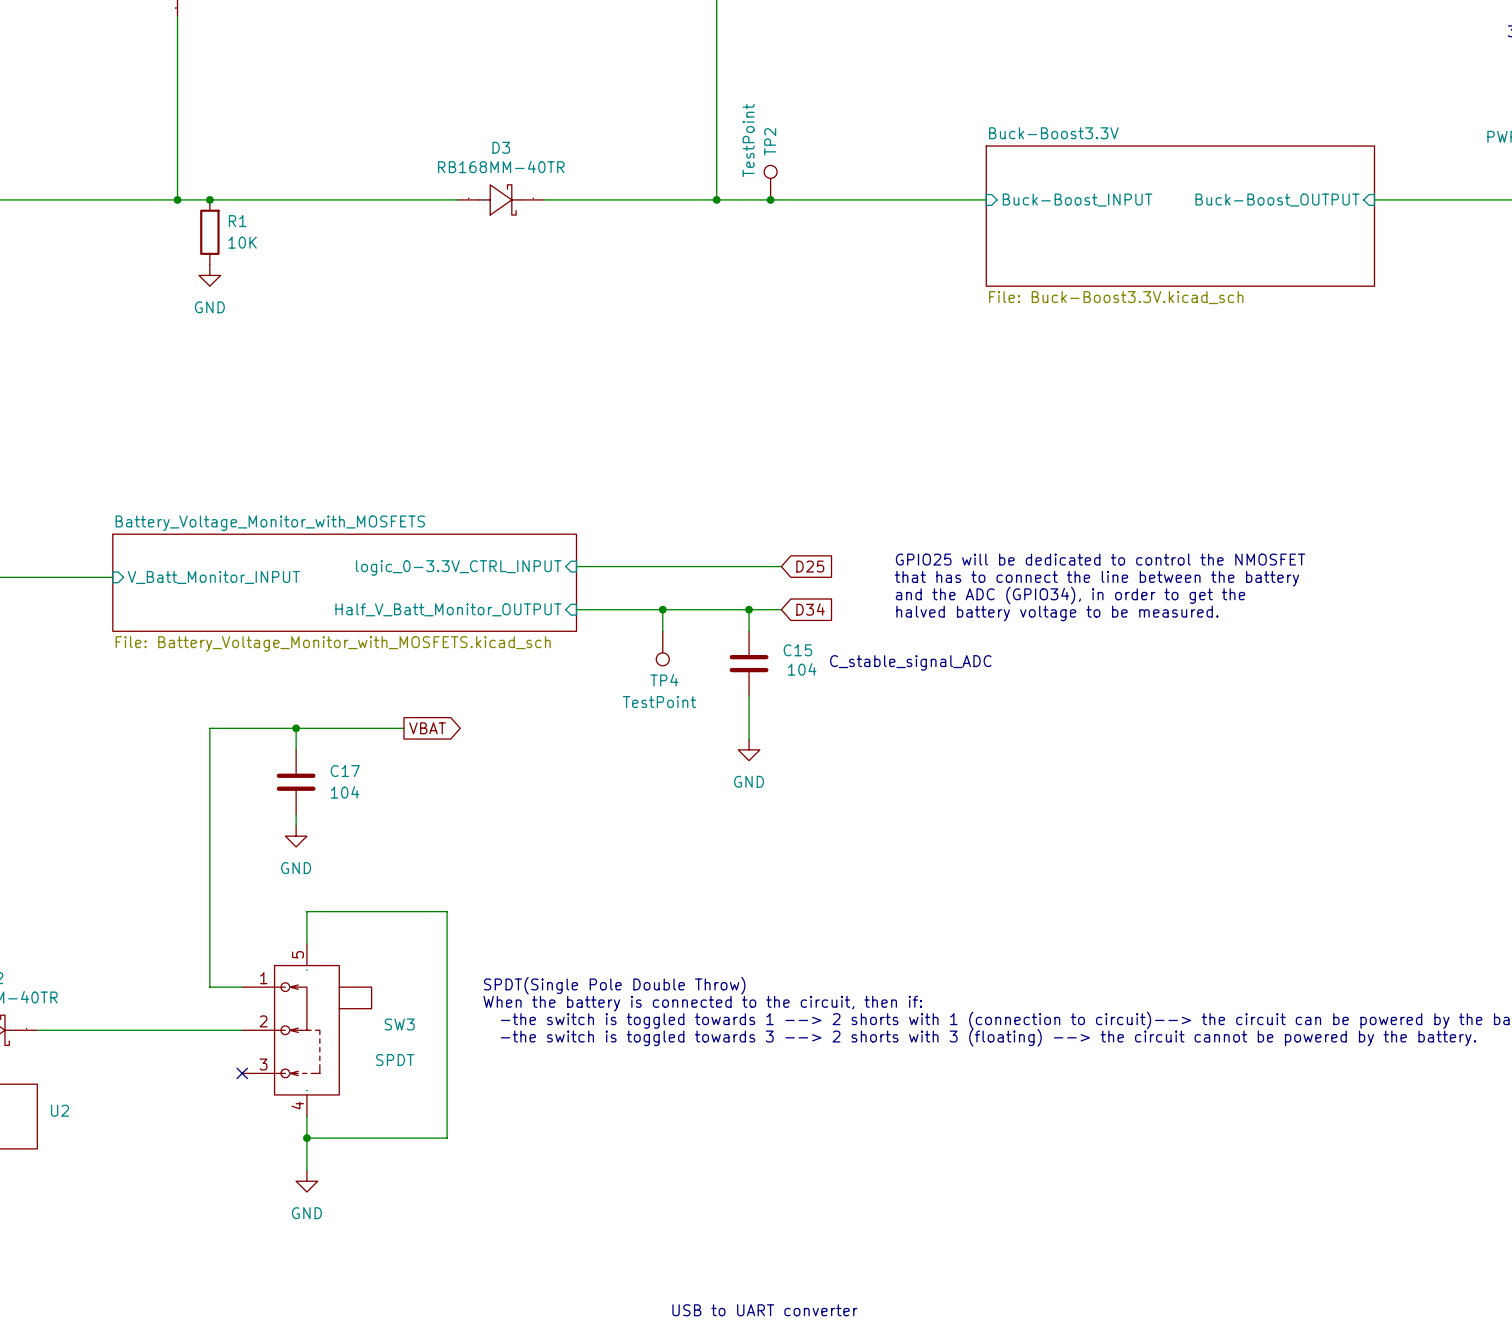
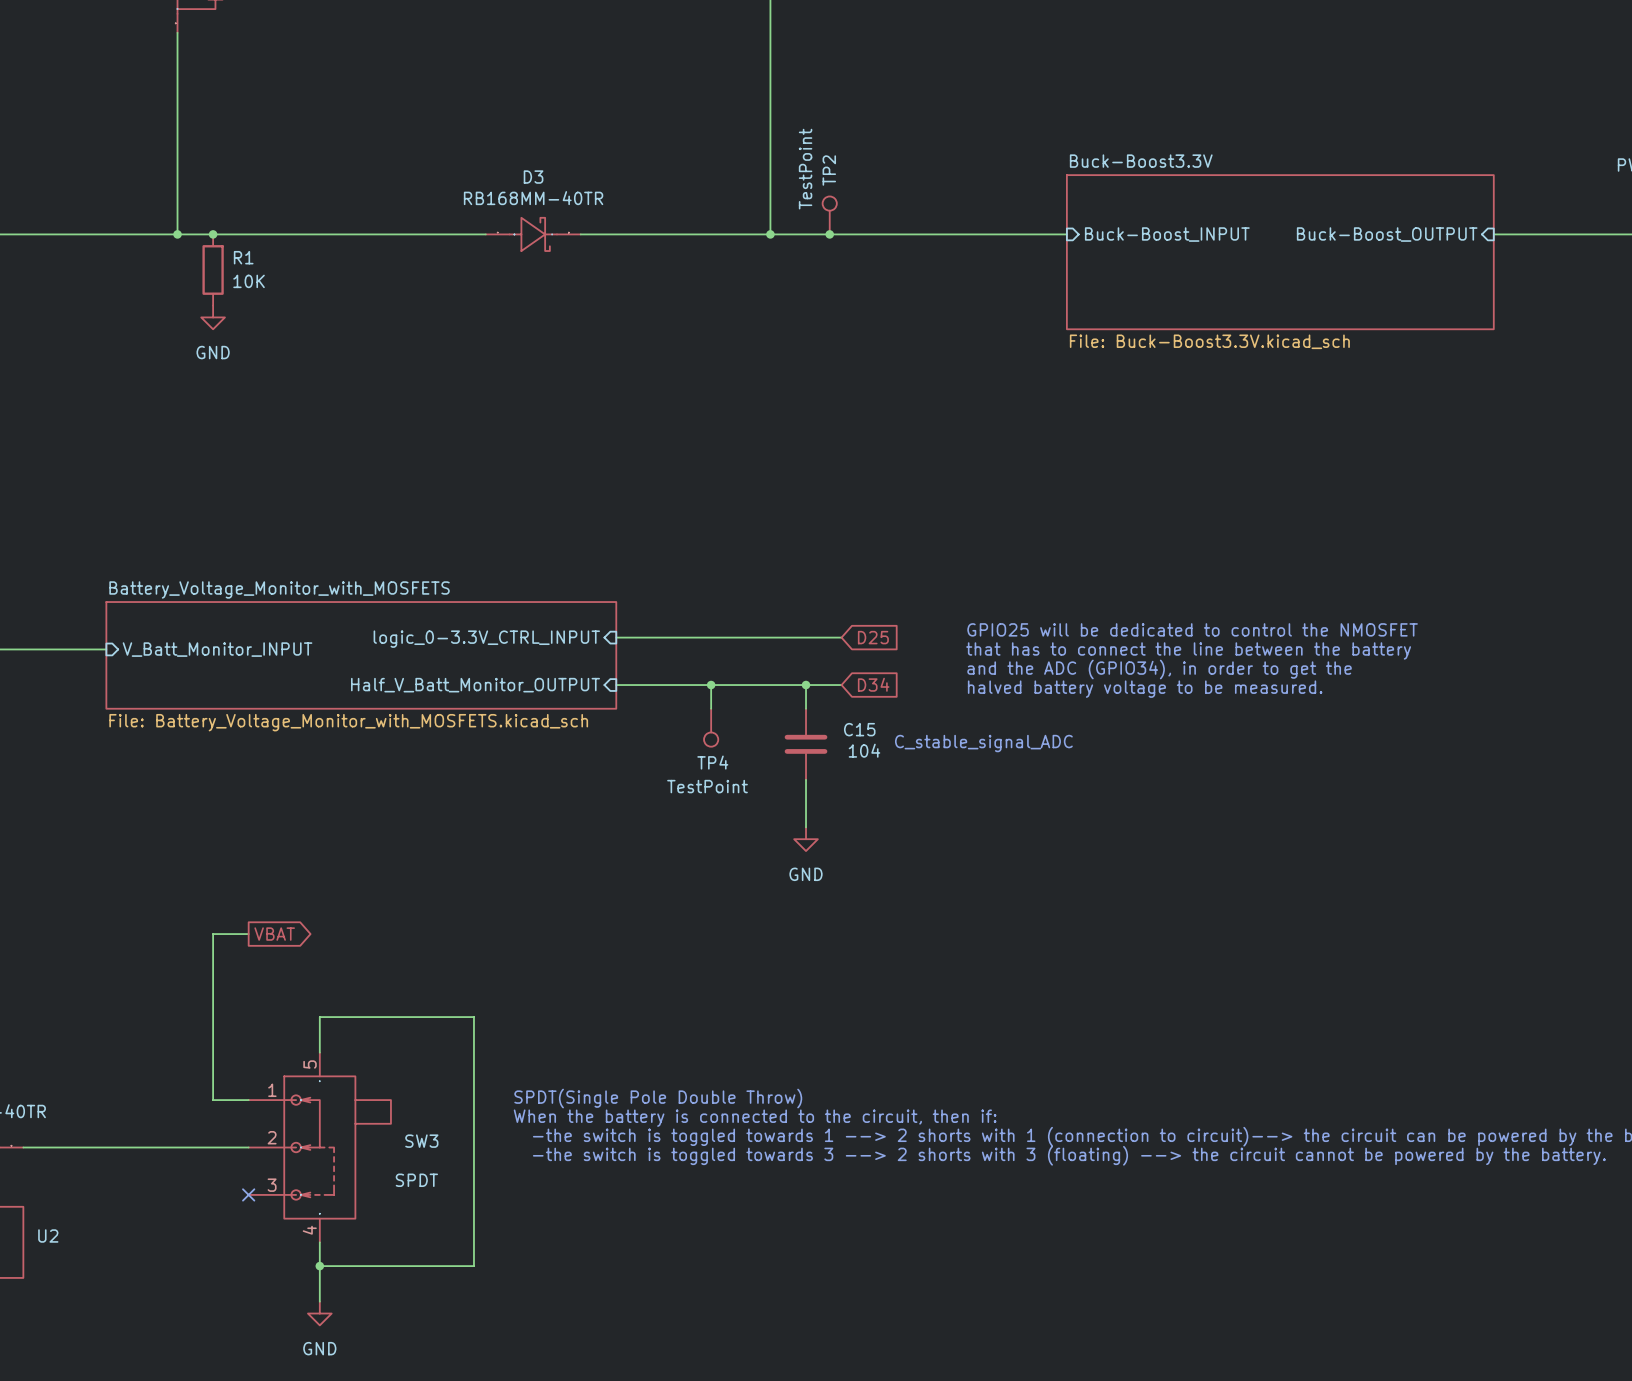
wire: (296, 728) (296, 749) -> none
junction: (296, 728) -> none
wire: (403, 728) (209, 728) (209, 836) -> (248, 934) (213, 934)
global label position: VBAT (427, 728) -> VBAT (274, 934)
C17: 104 (296, 782) -> none
wire: (296, 814) (296, 825) -> none
power symbol: GND (296, 836) -> none

